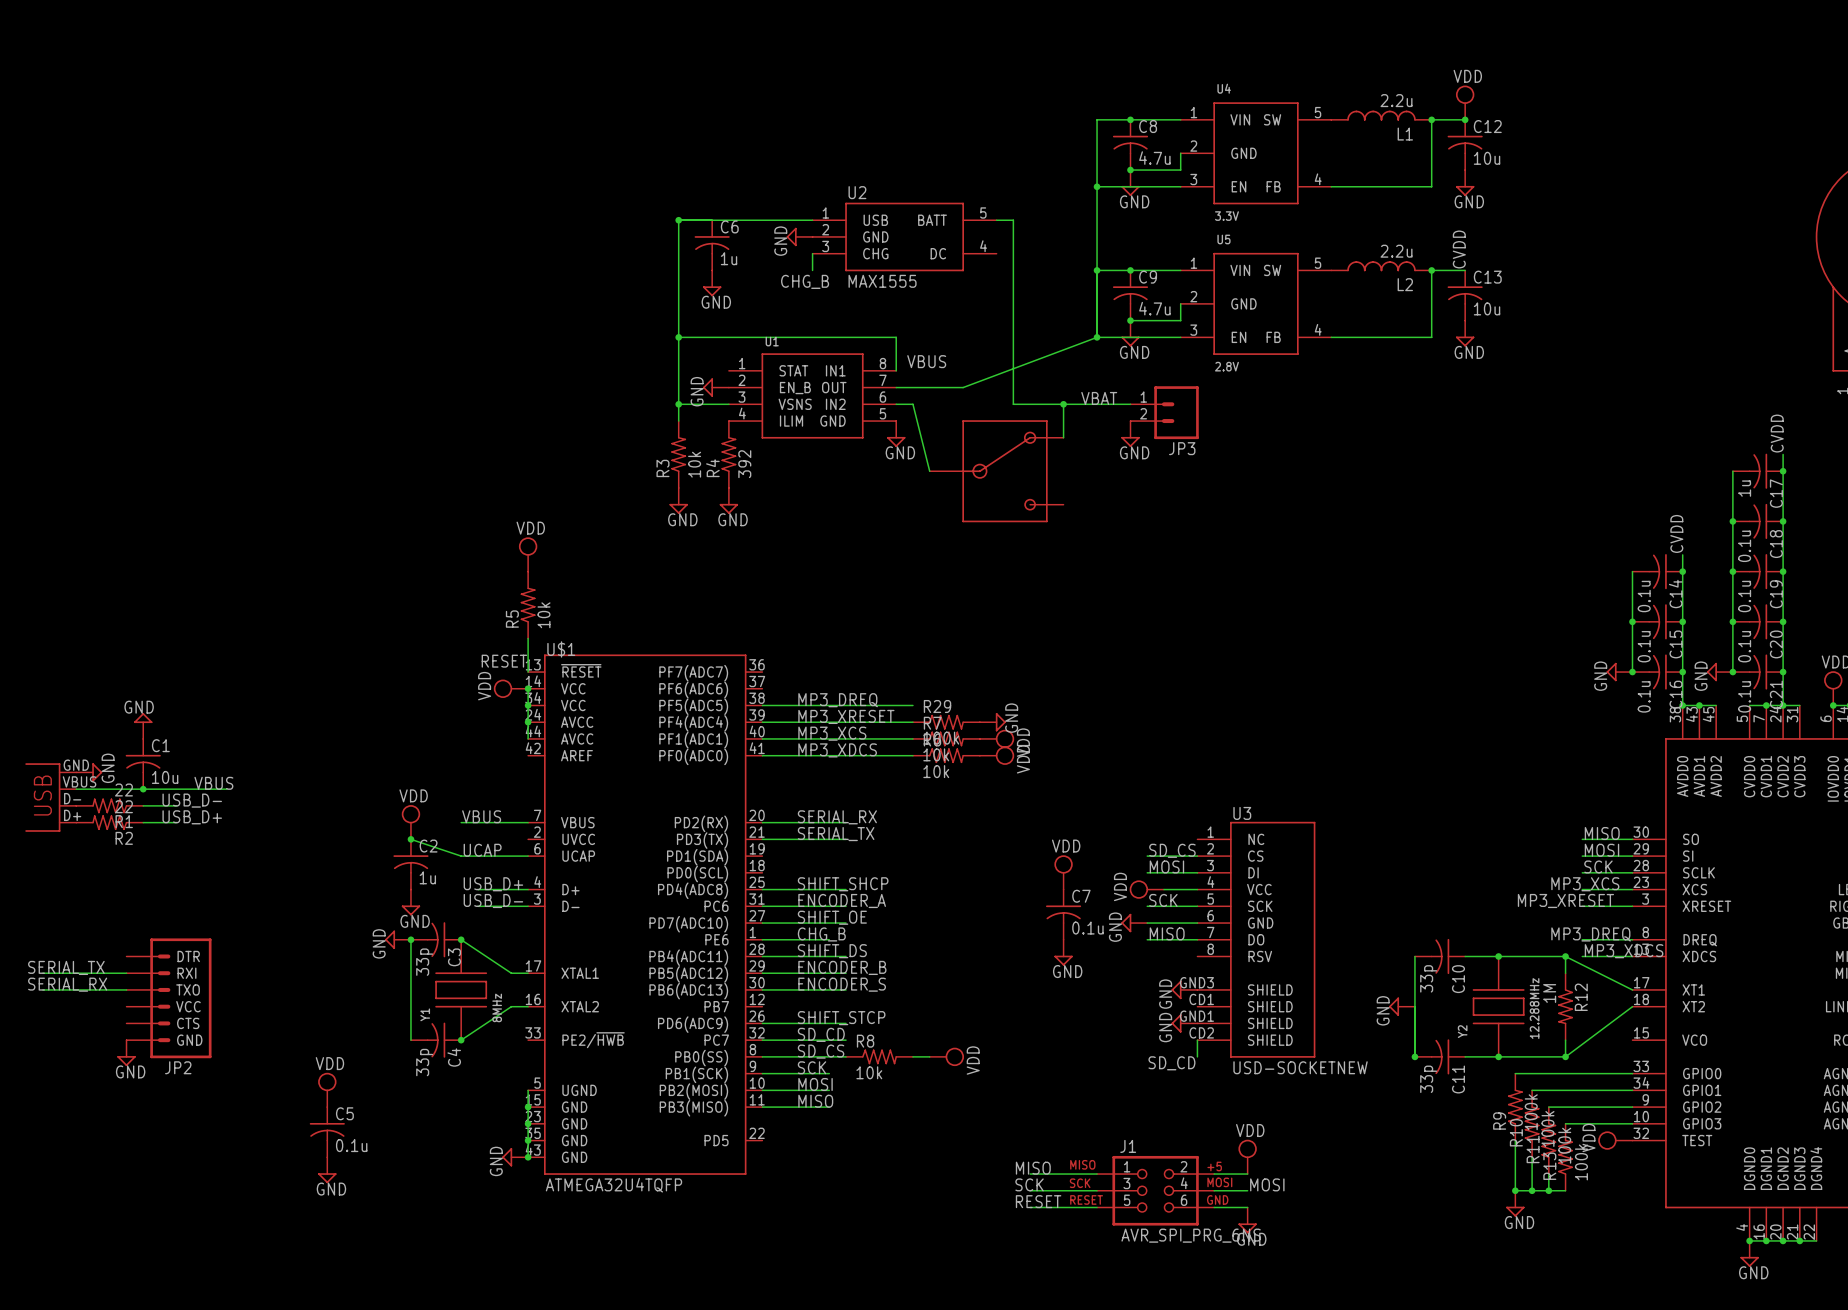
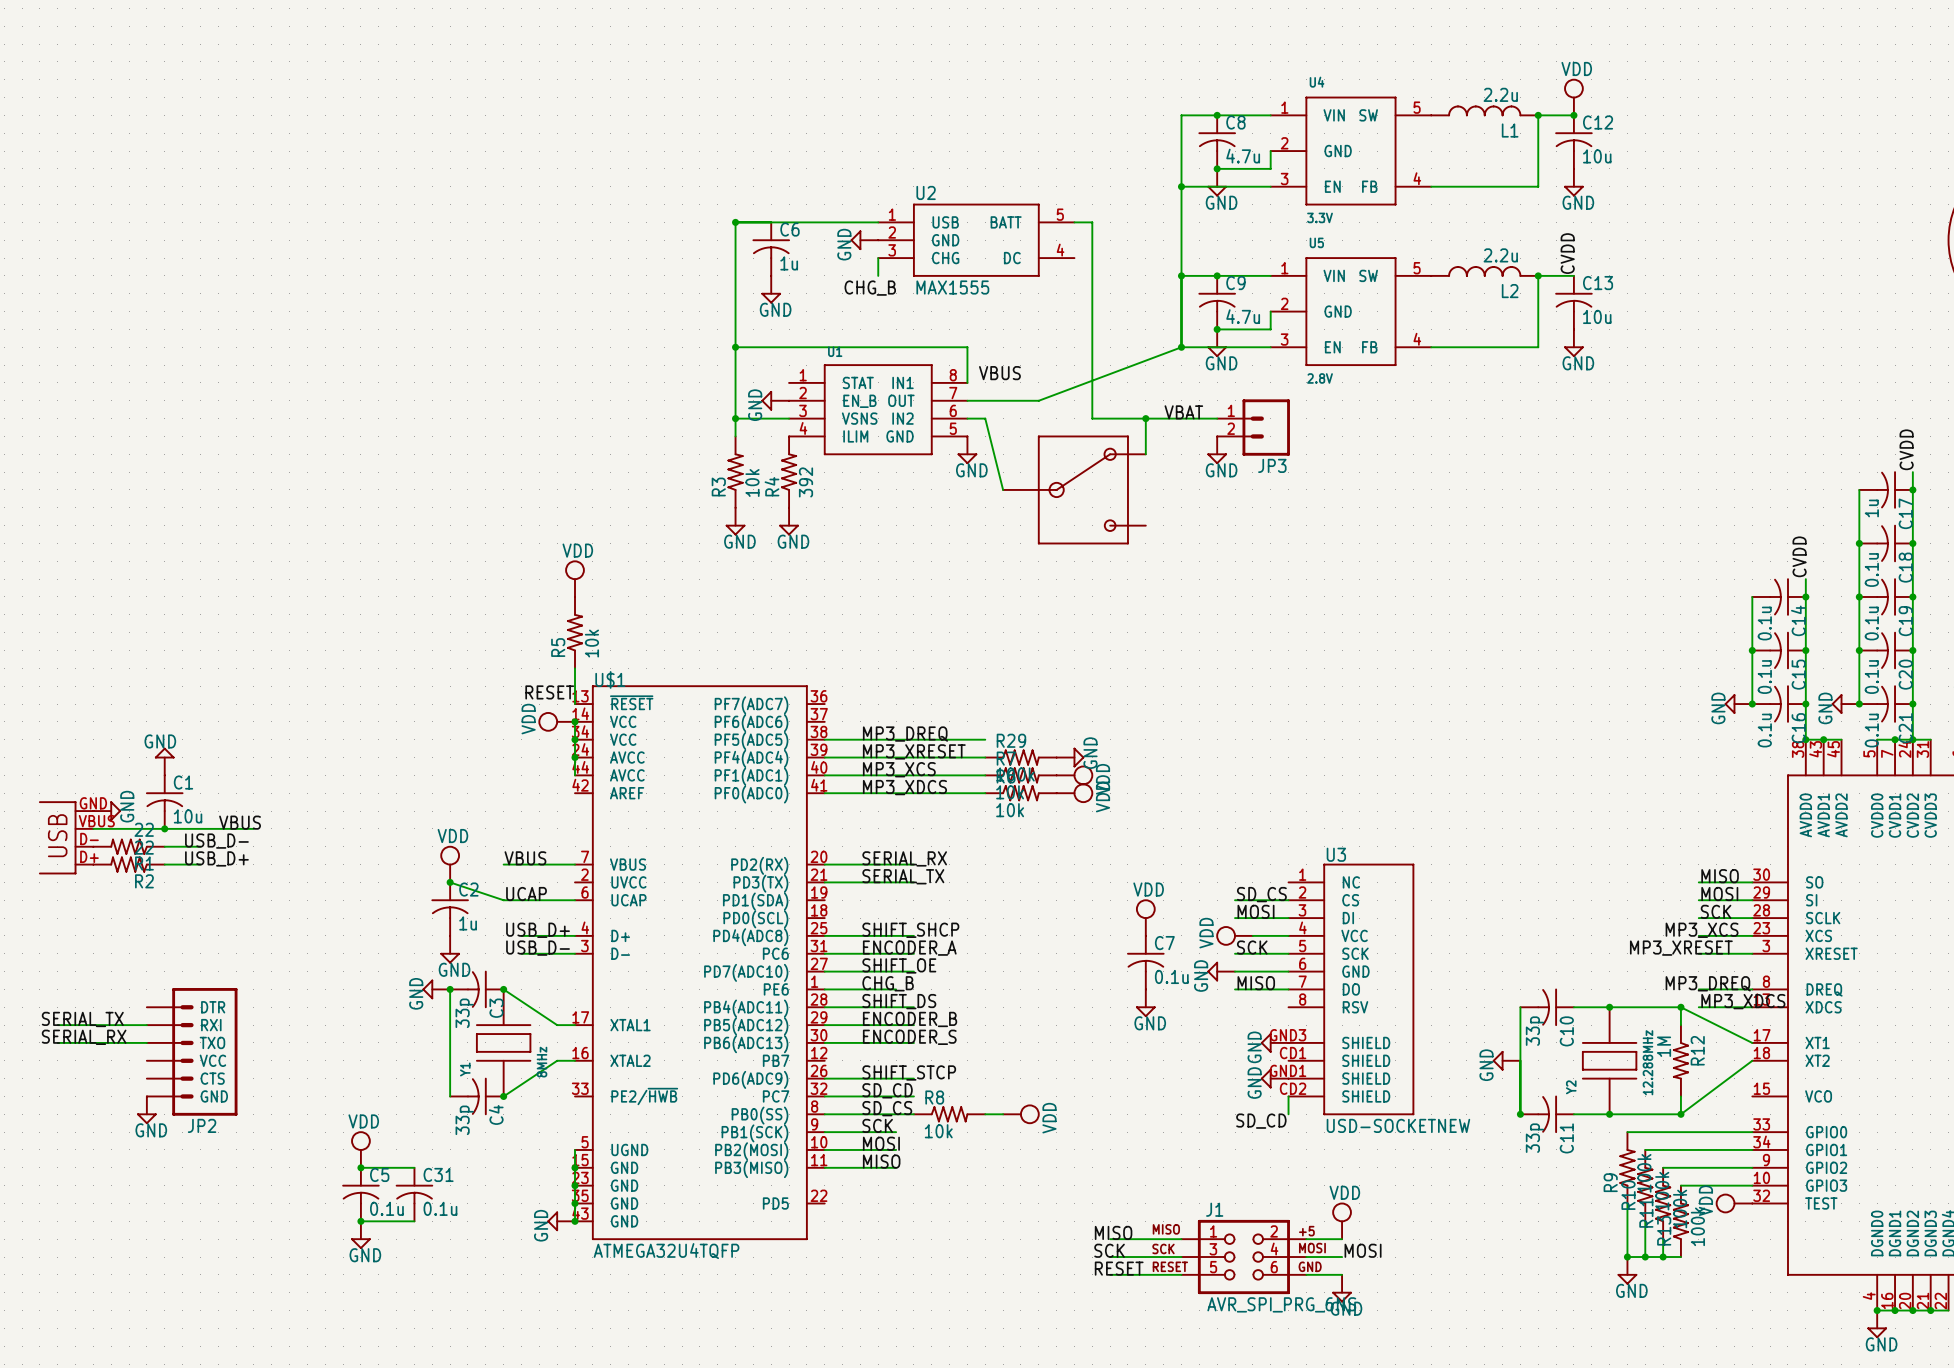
wire: none -> (360, 1167) (414, 1167)
junction: none -> (360, 1167)
C31: none -> 0.1u (414, 1194)
wire: none -> (360, 1221) (414, 1221)
junction: none -> (360, 1221)

